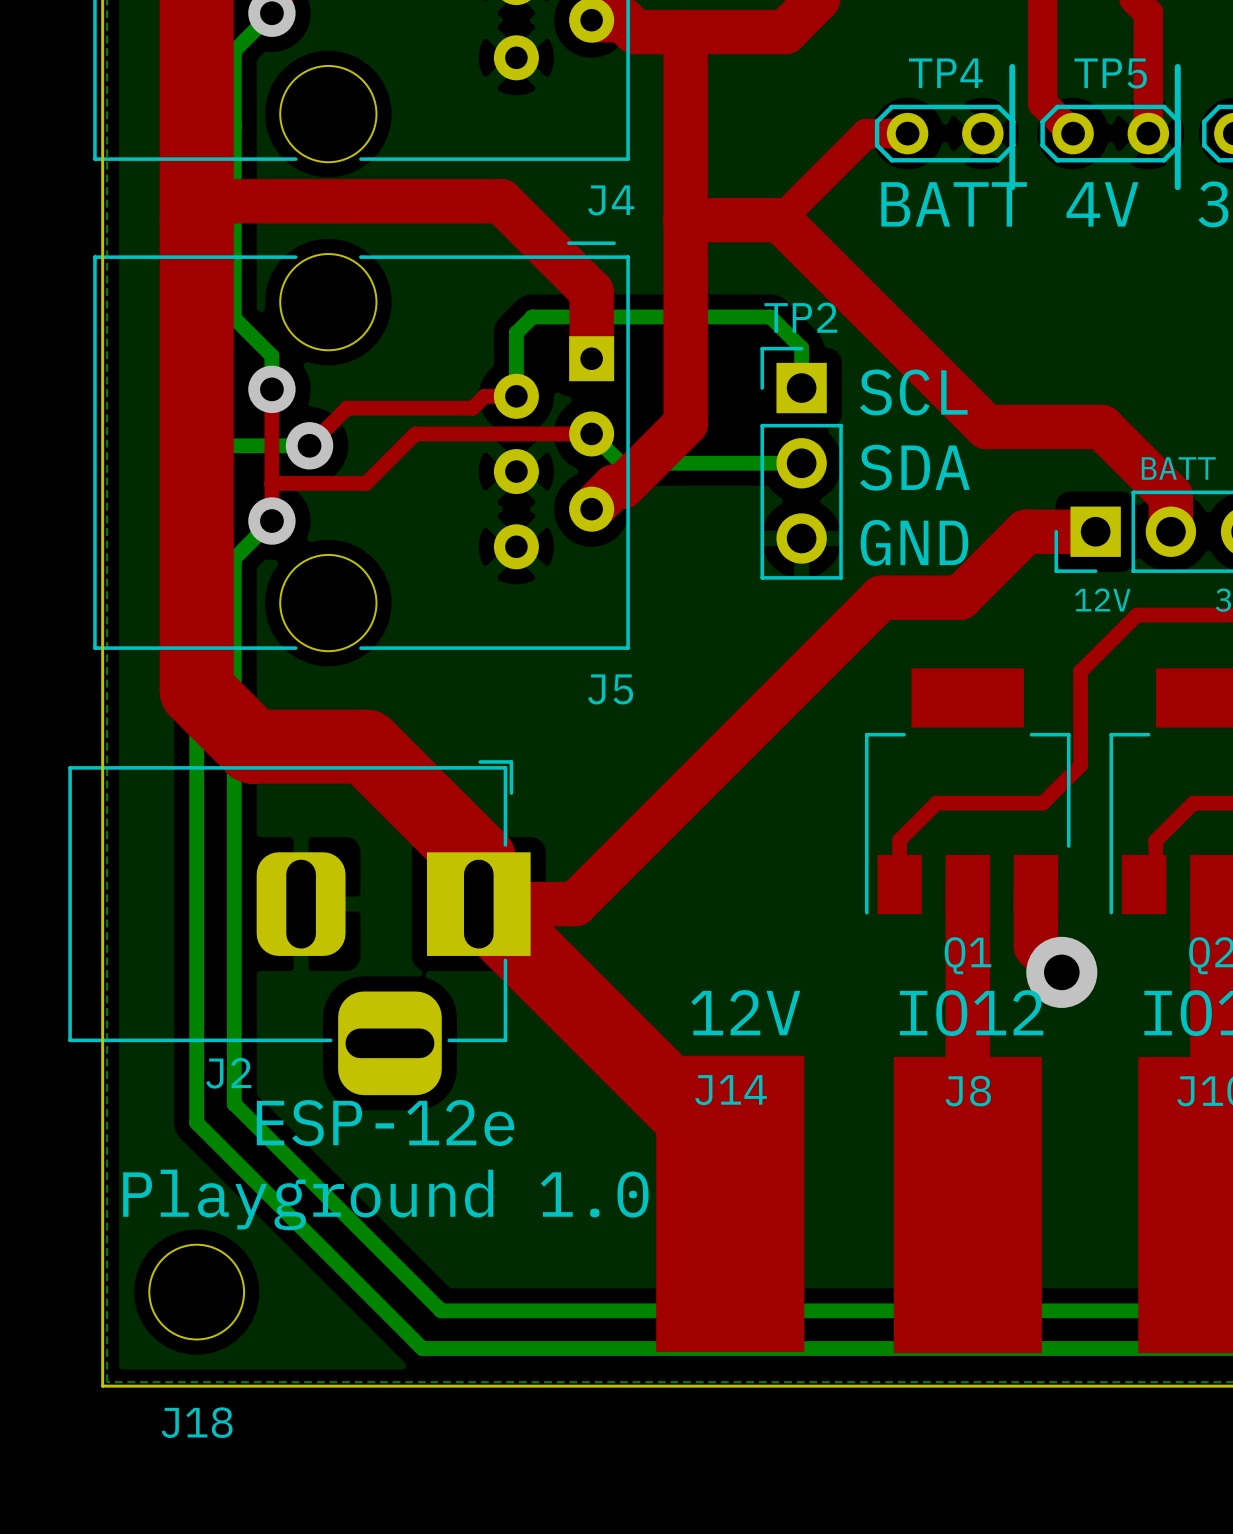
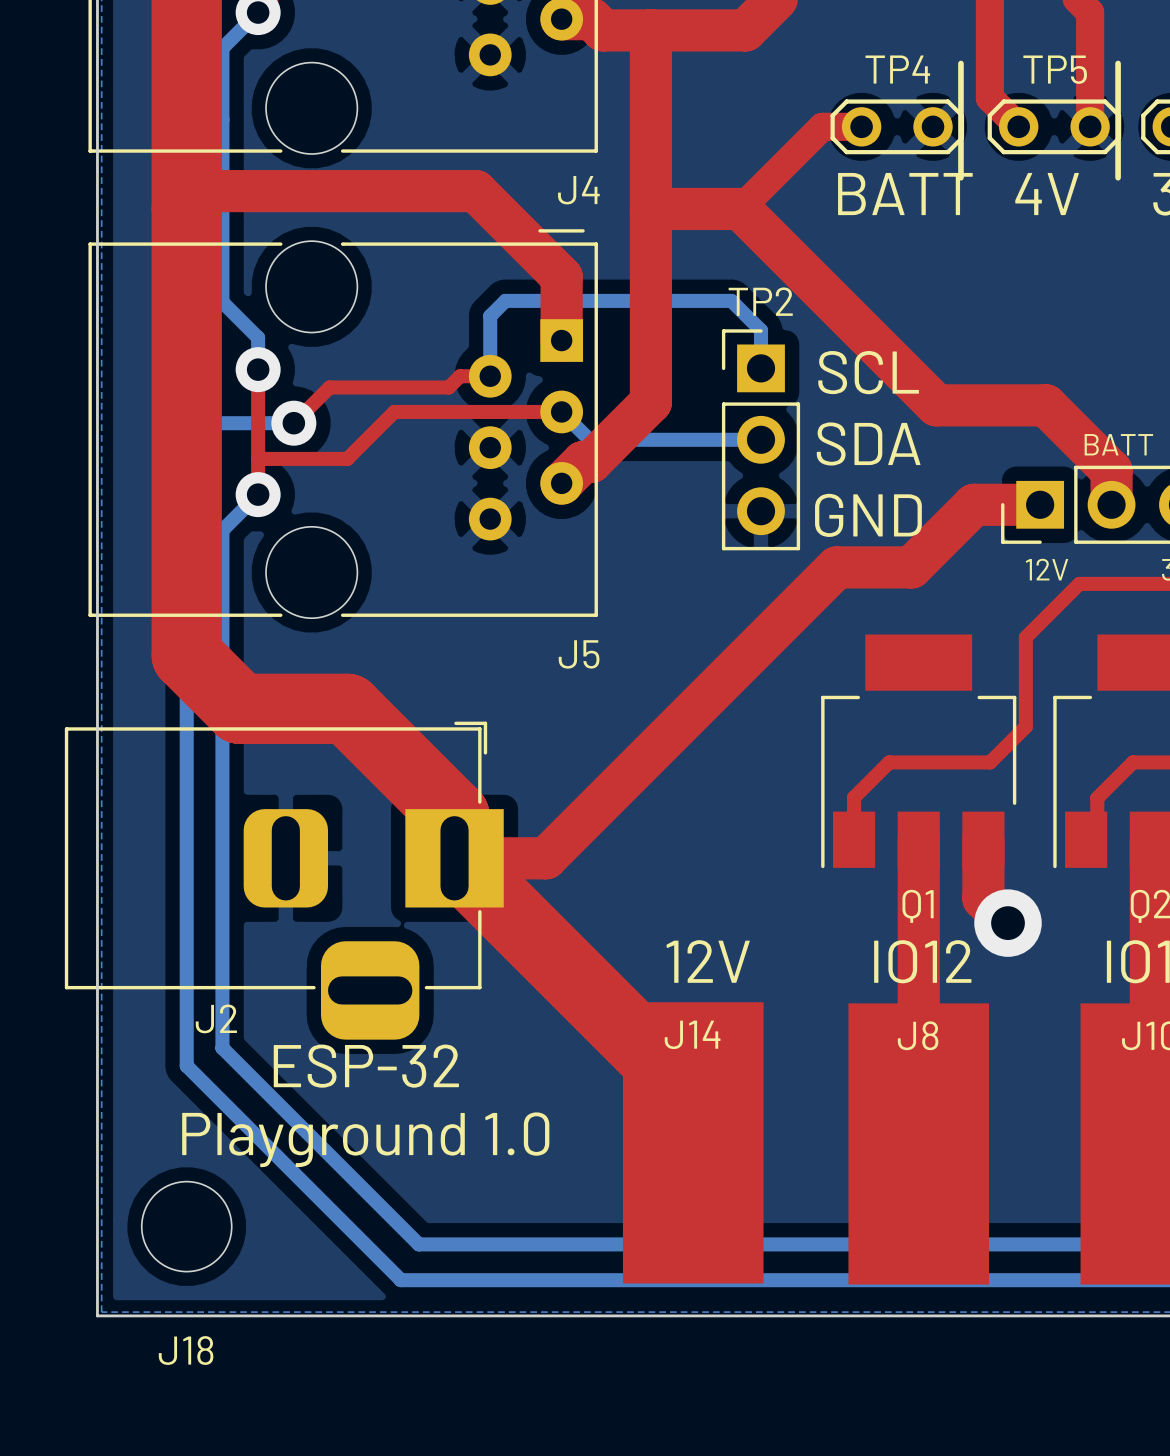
text: ESP-12e (385, 1123) -> ESP-32 (366, 1066)

